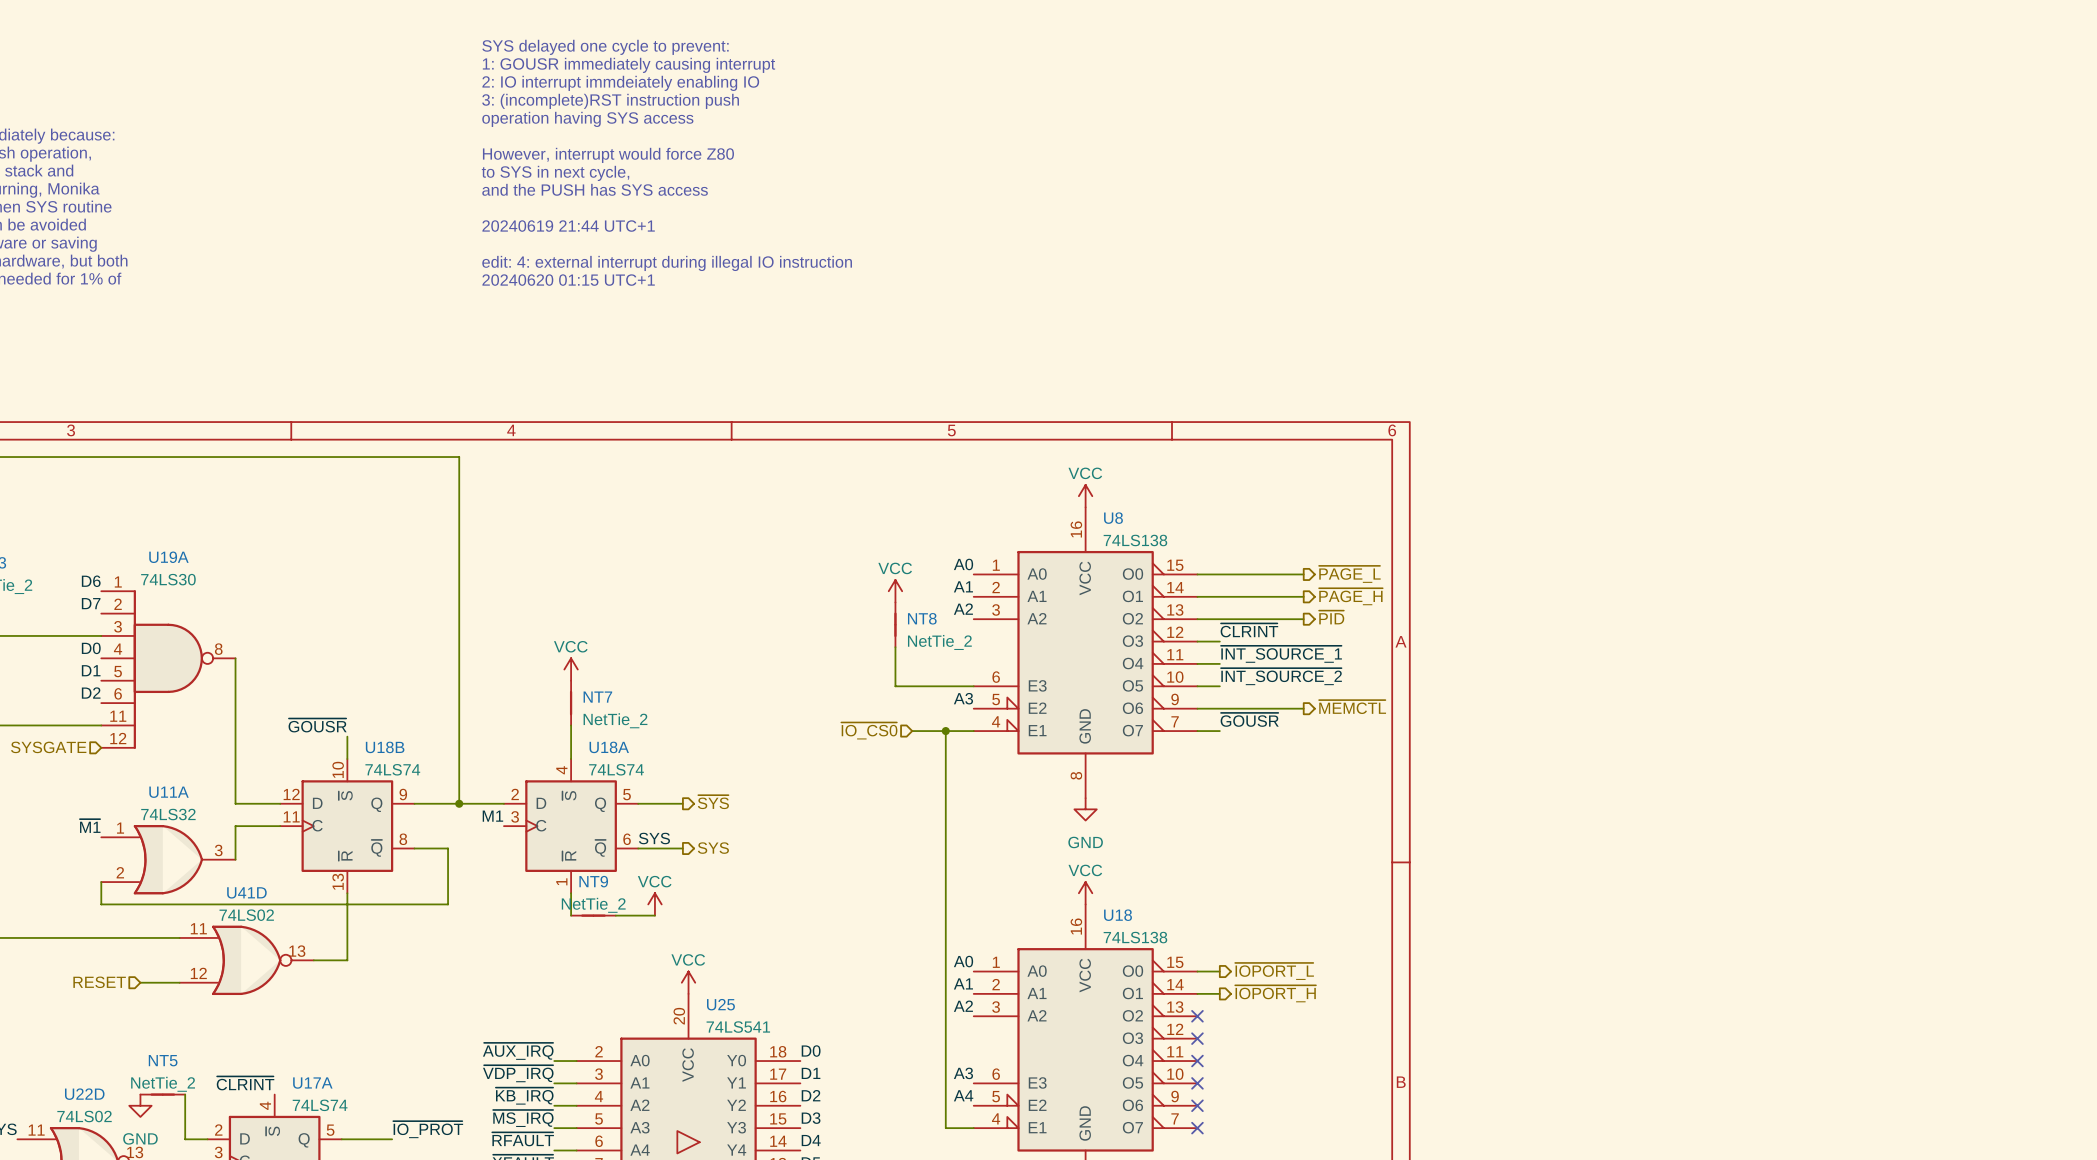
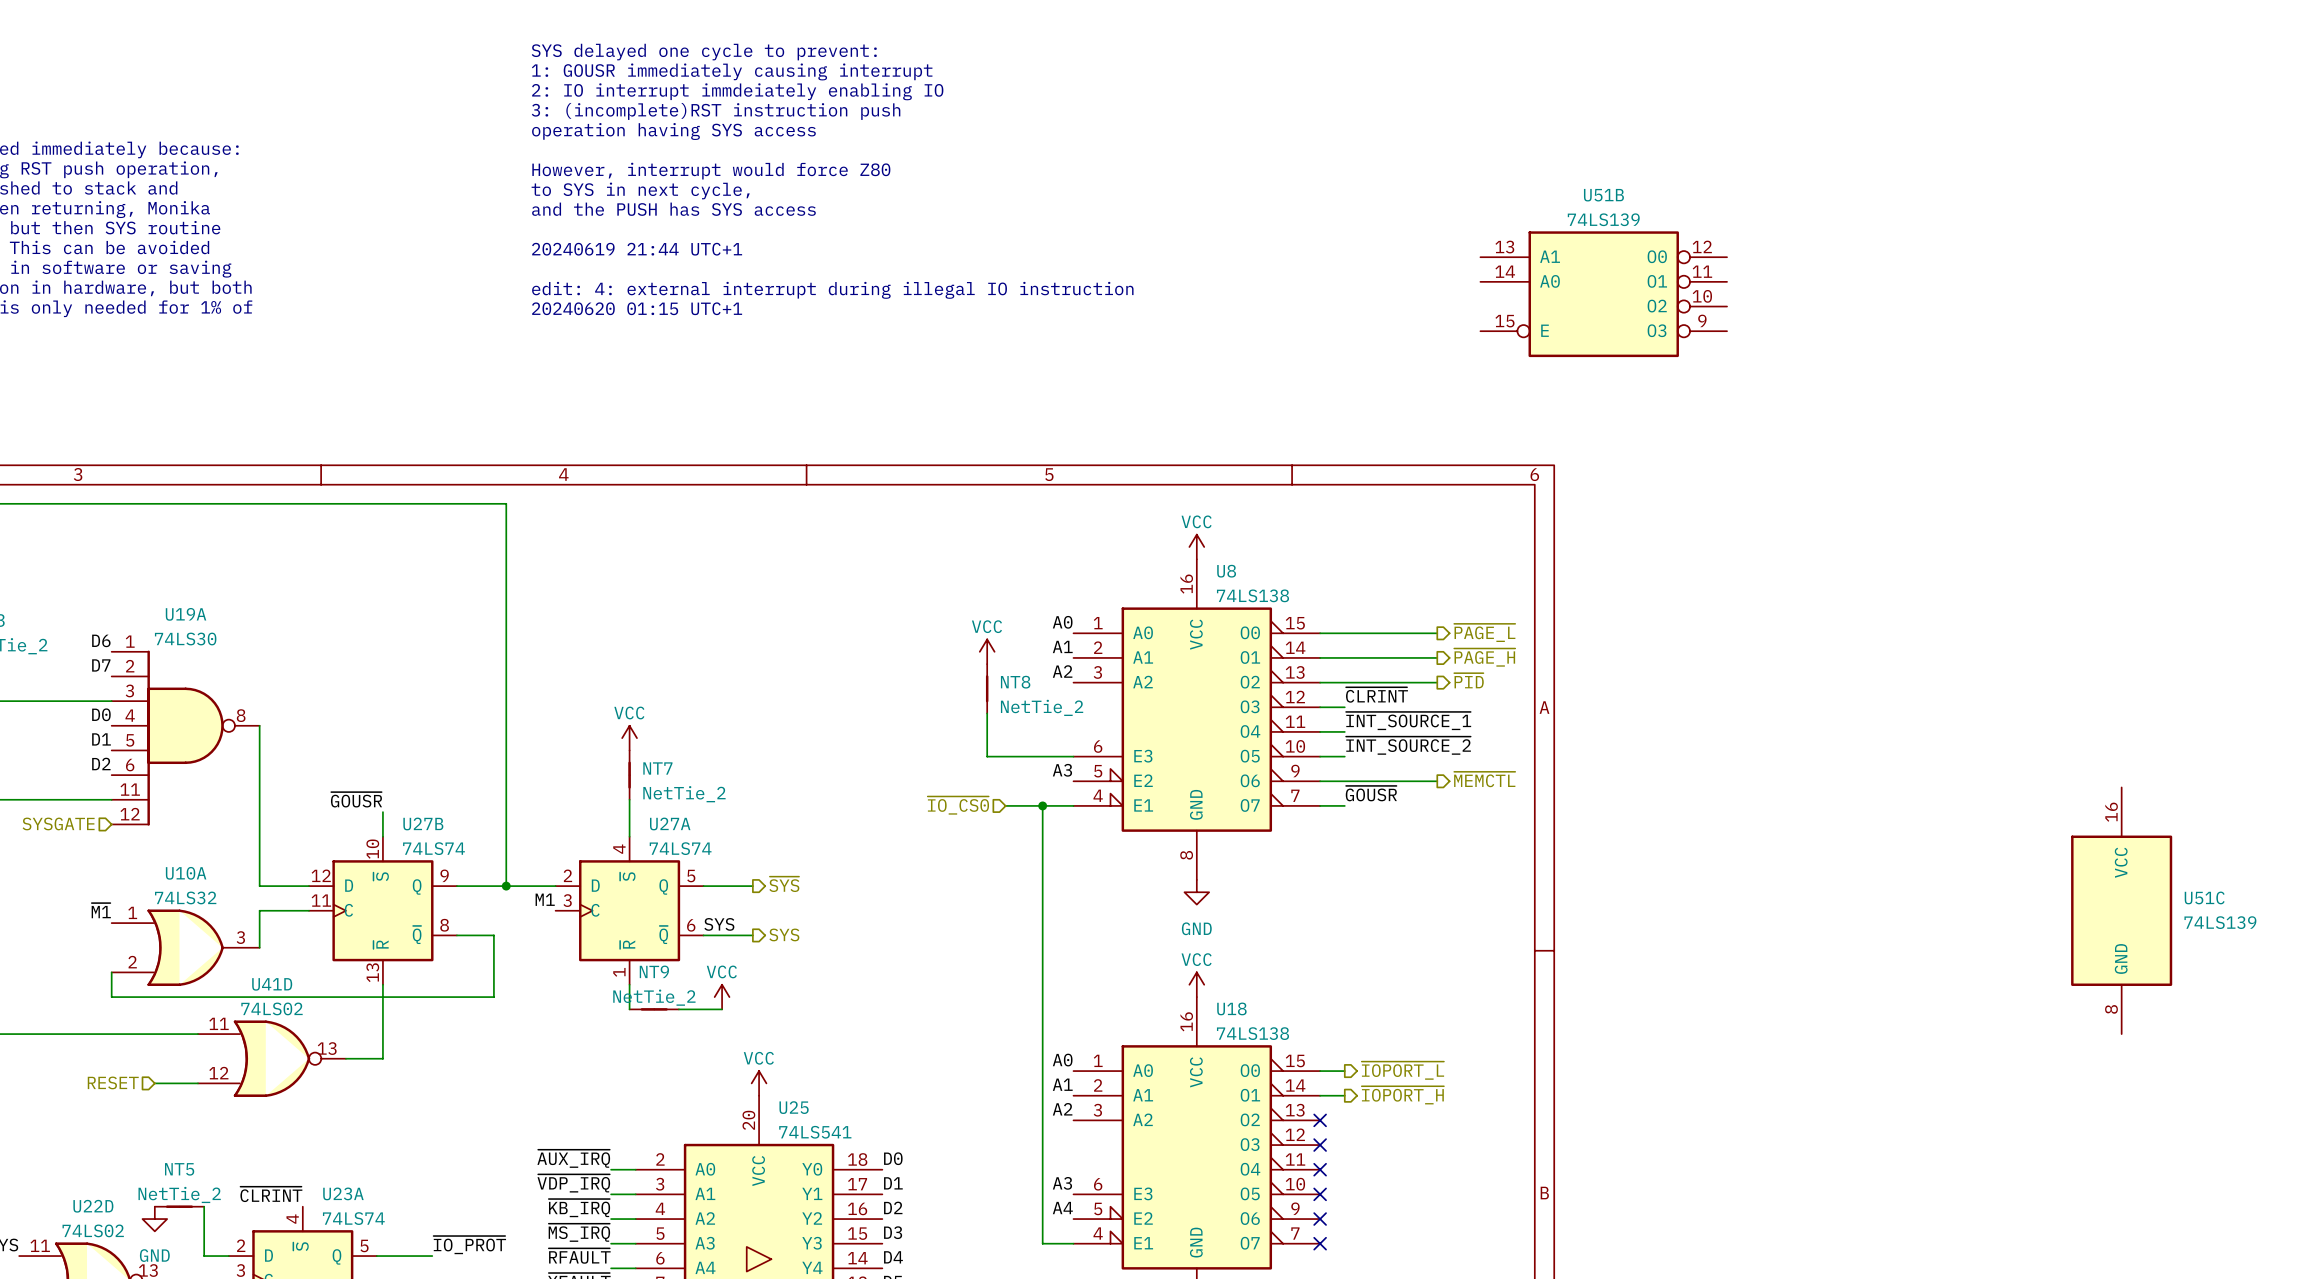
U51B: none -> 74LS139 (1603, 294)
U18B name: U18B (385, 747) -> U27B (423, 823)
U18A name: U18A (609, 747) -> U27A (670, 823)
U11A name: U11A (169, 792) -> U10A (186, 873)
U51C: none -> 74LS139 (2121, 910)
U17A name: U17A (312, 1083) -> U23A (343, 1193)

